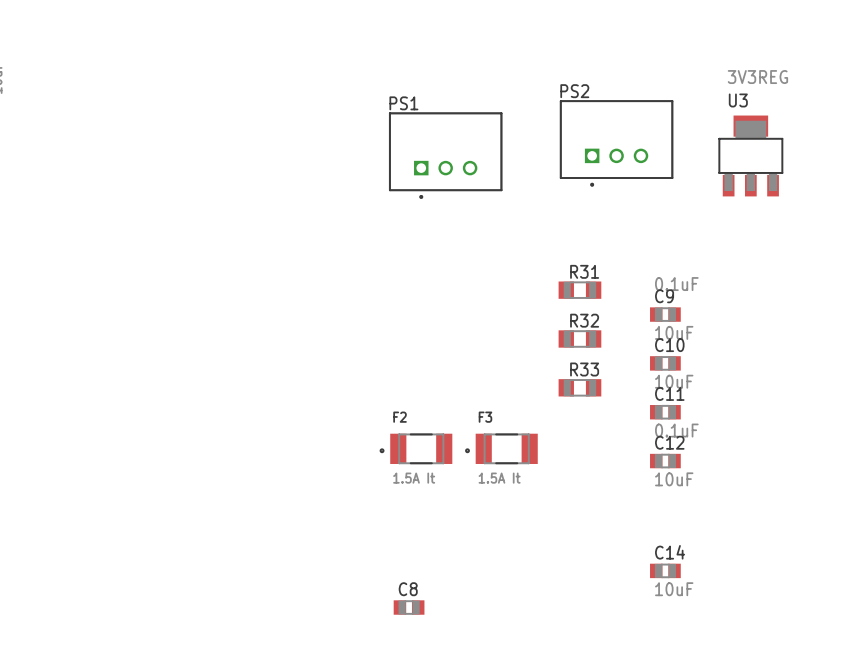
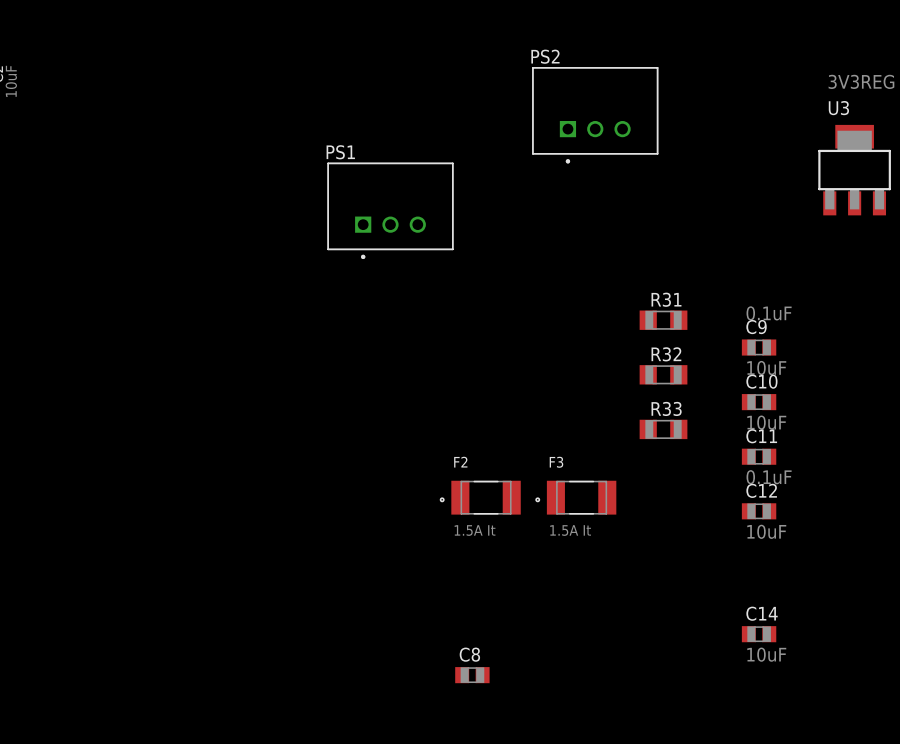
PS2 position: (616, 143) -> (595, 115)
PS1 position: (445, 155) -> (390, 210)

